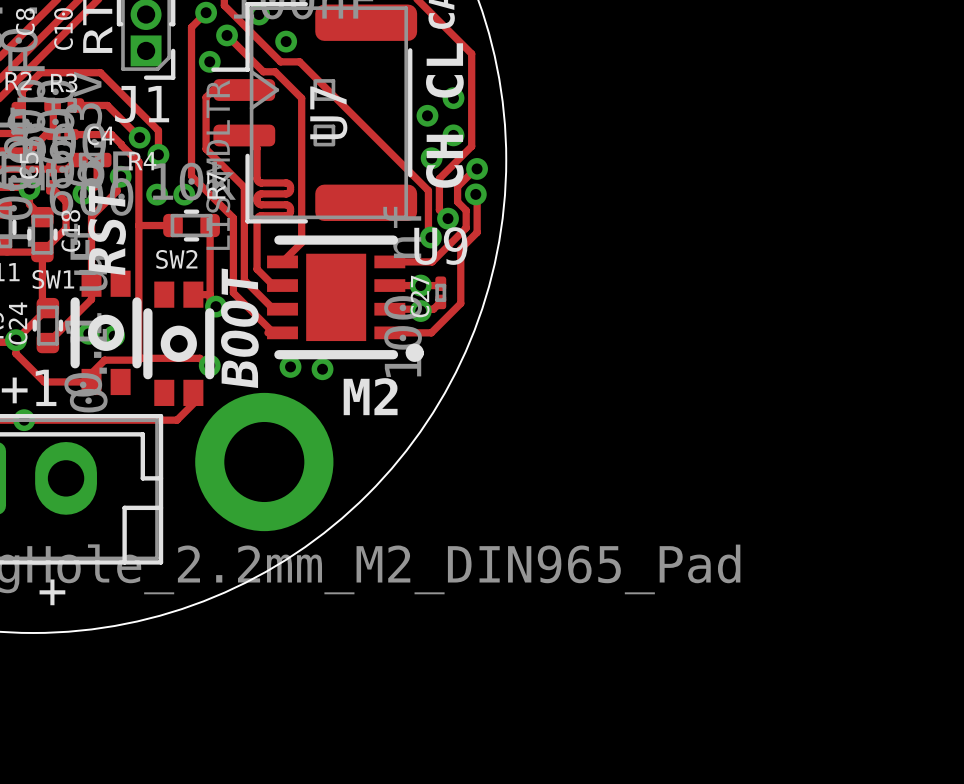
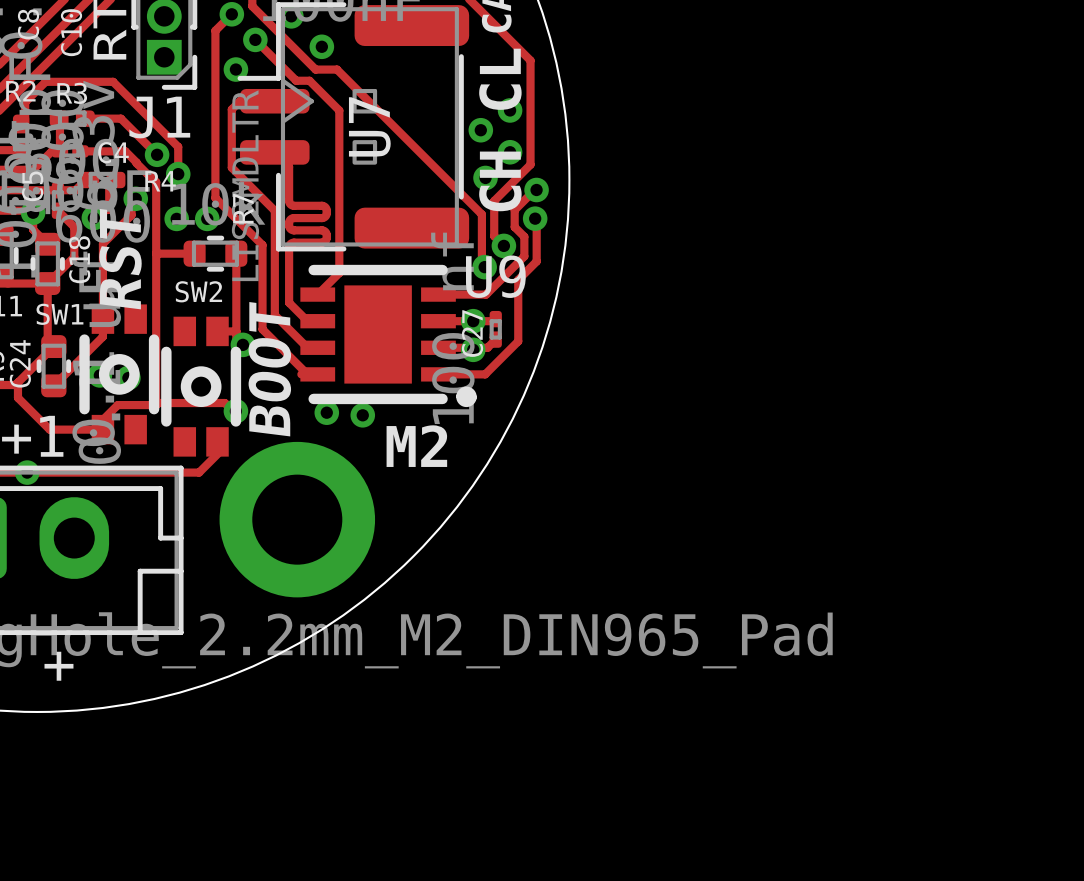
via: (15, 340) -> none

